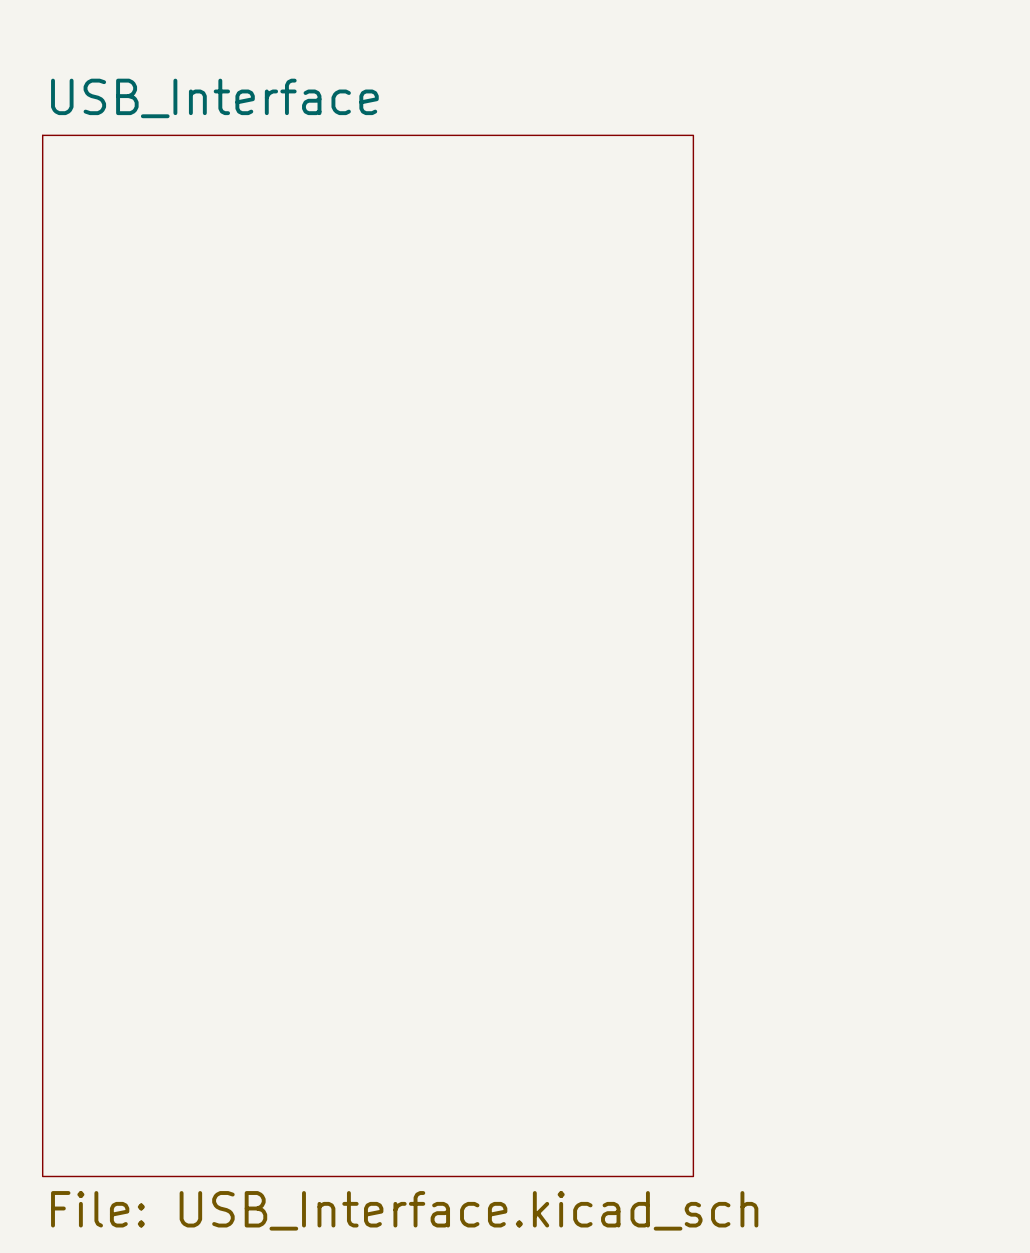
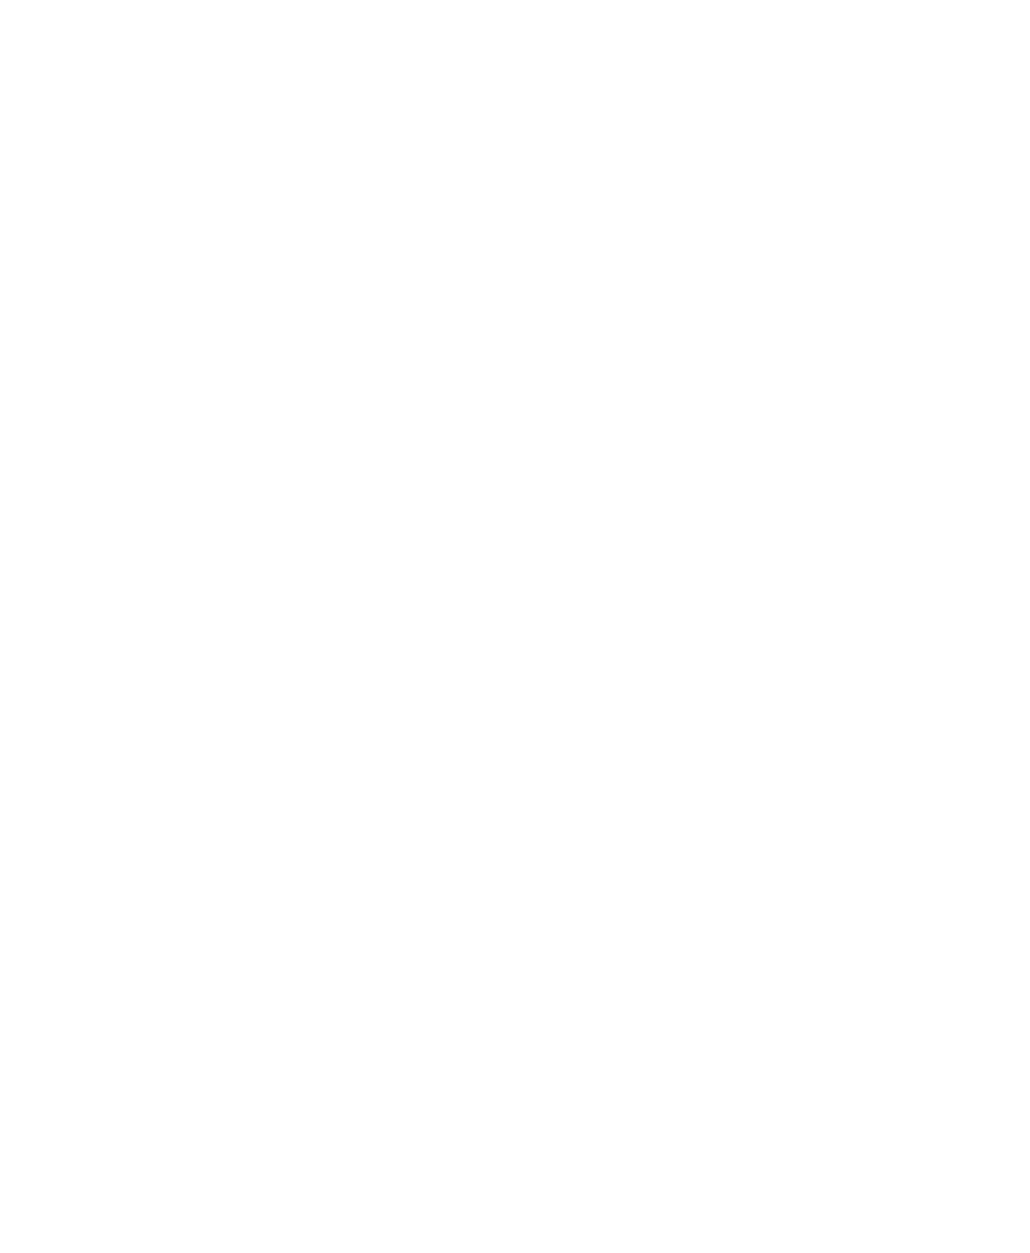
sheet USB_Interface: File: USB_Interface.kicad_sch (368, 655) -> none

